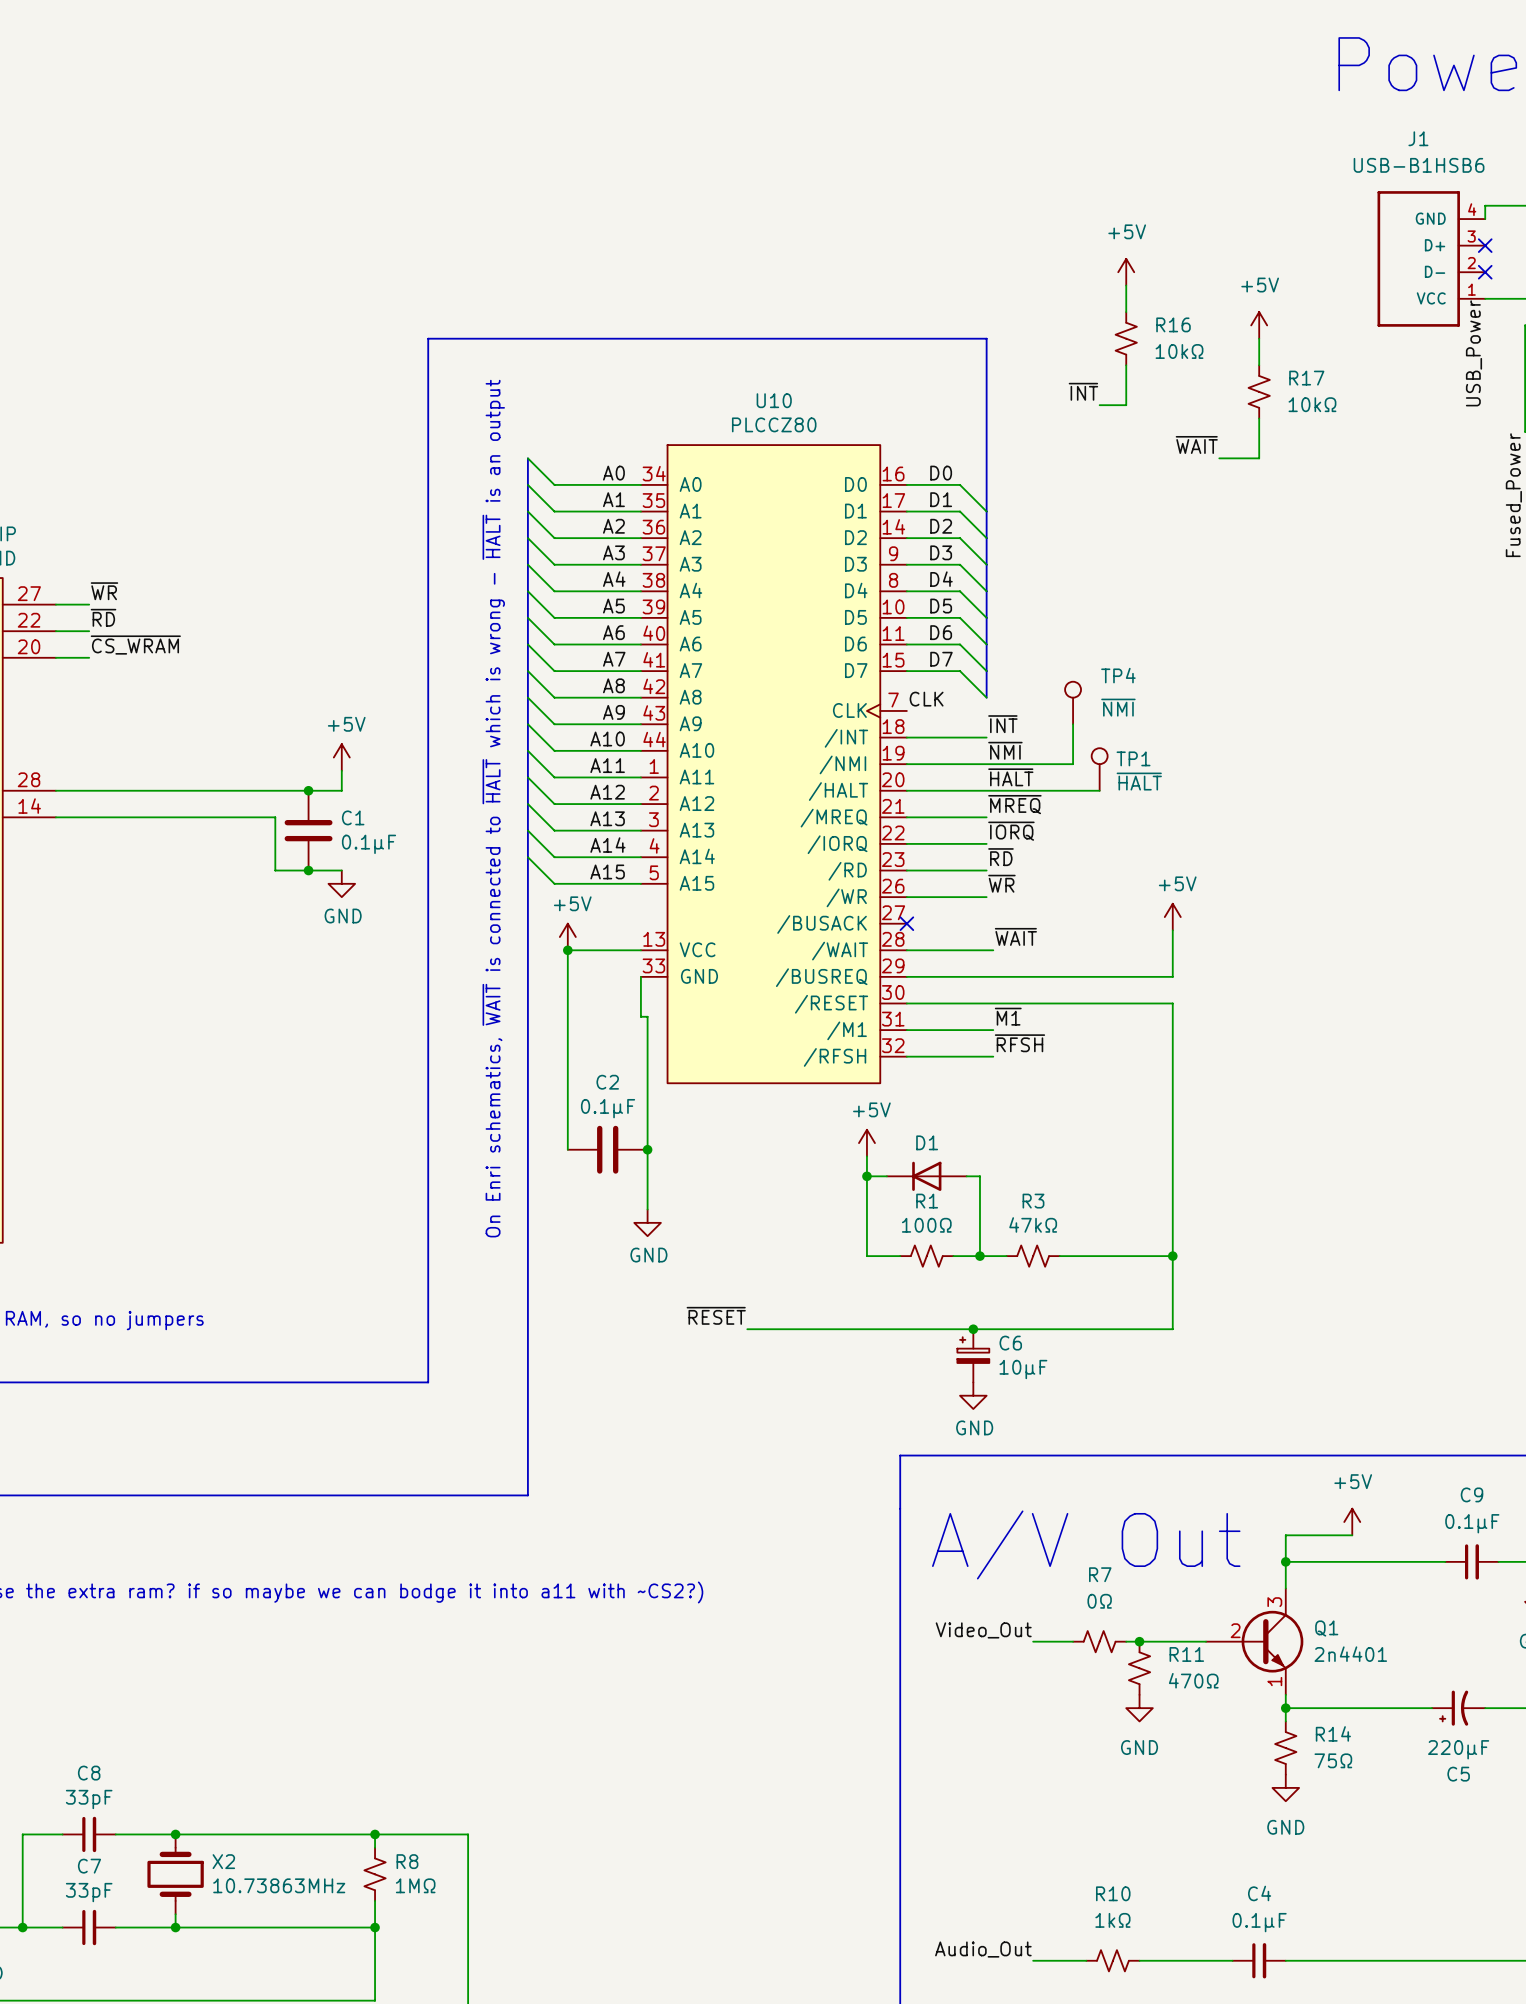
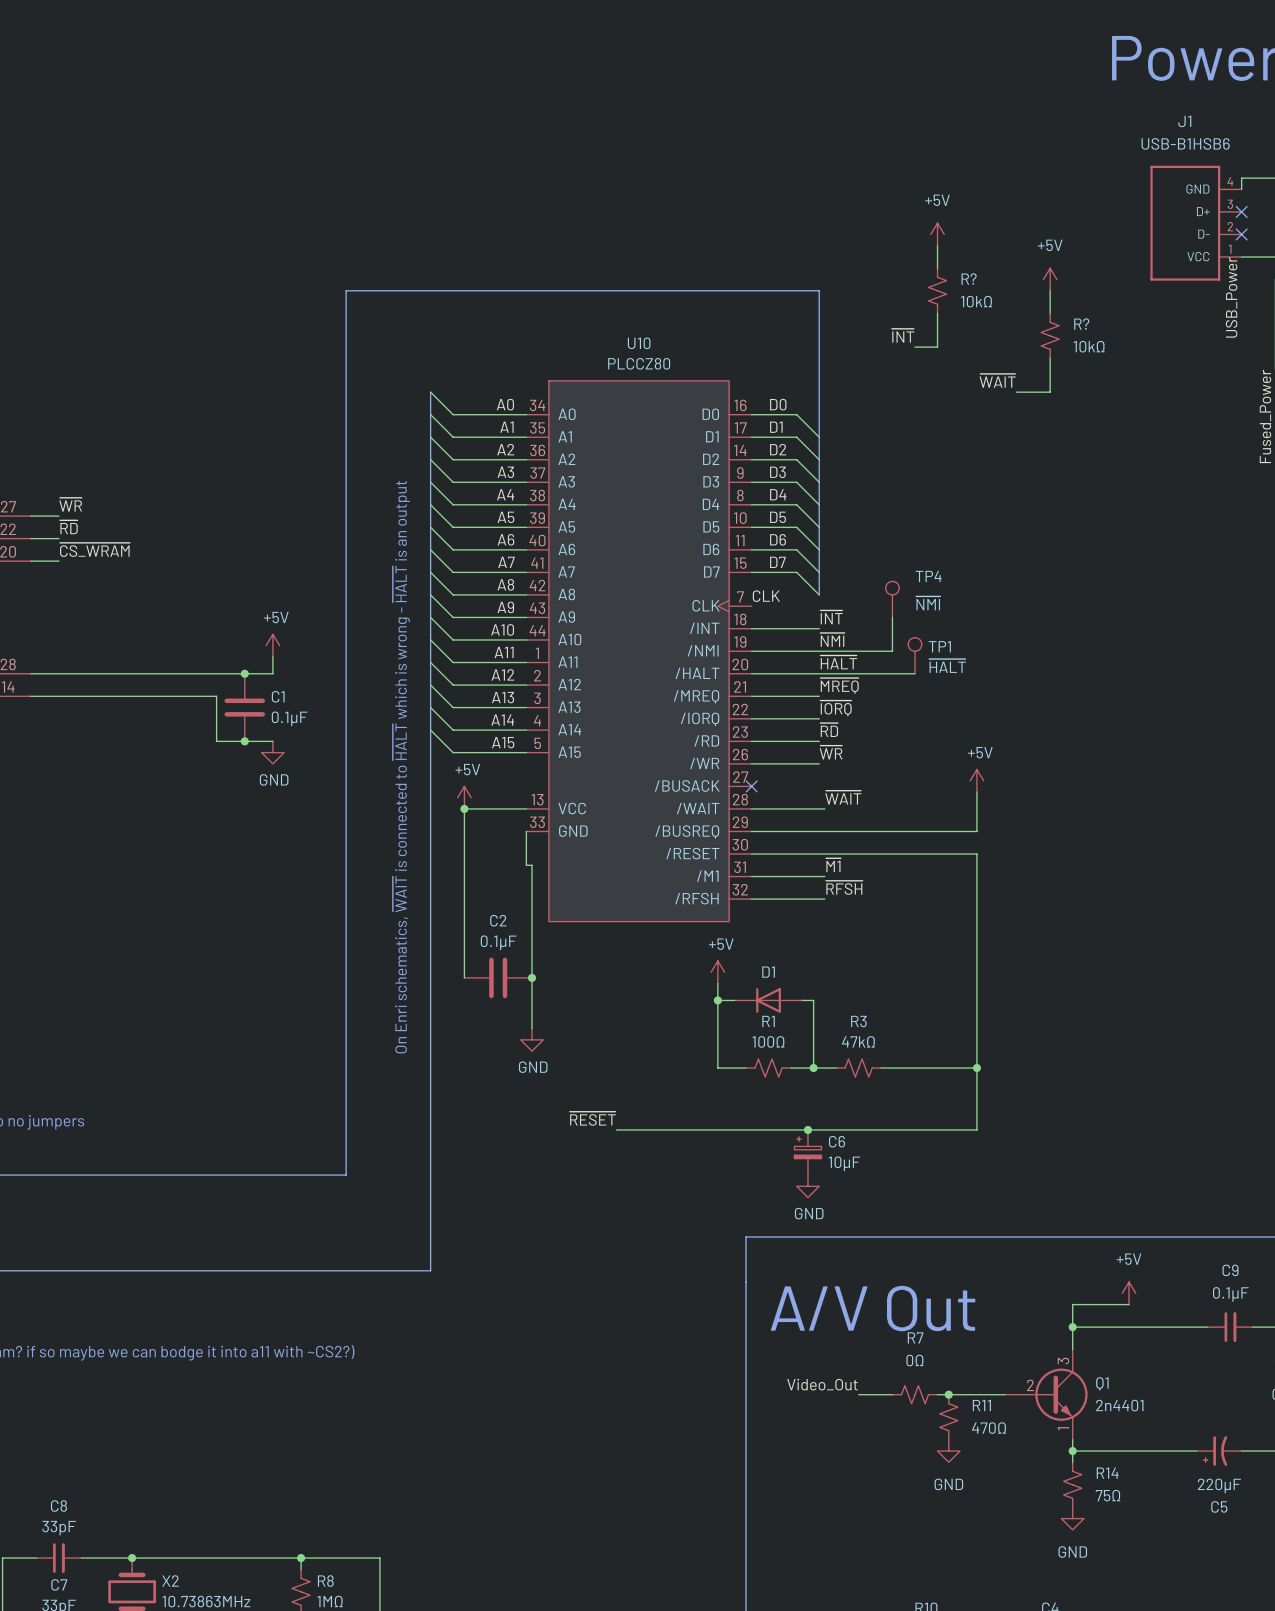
R16 name: R16 (1173, 324) -> R? (969, 279)
R17 name: R17 (1306, 378) -> R? (1081, 324)

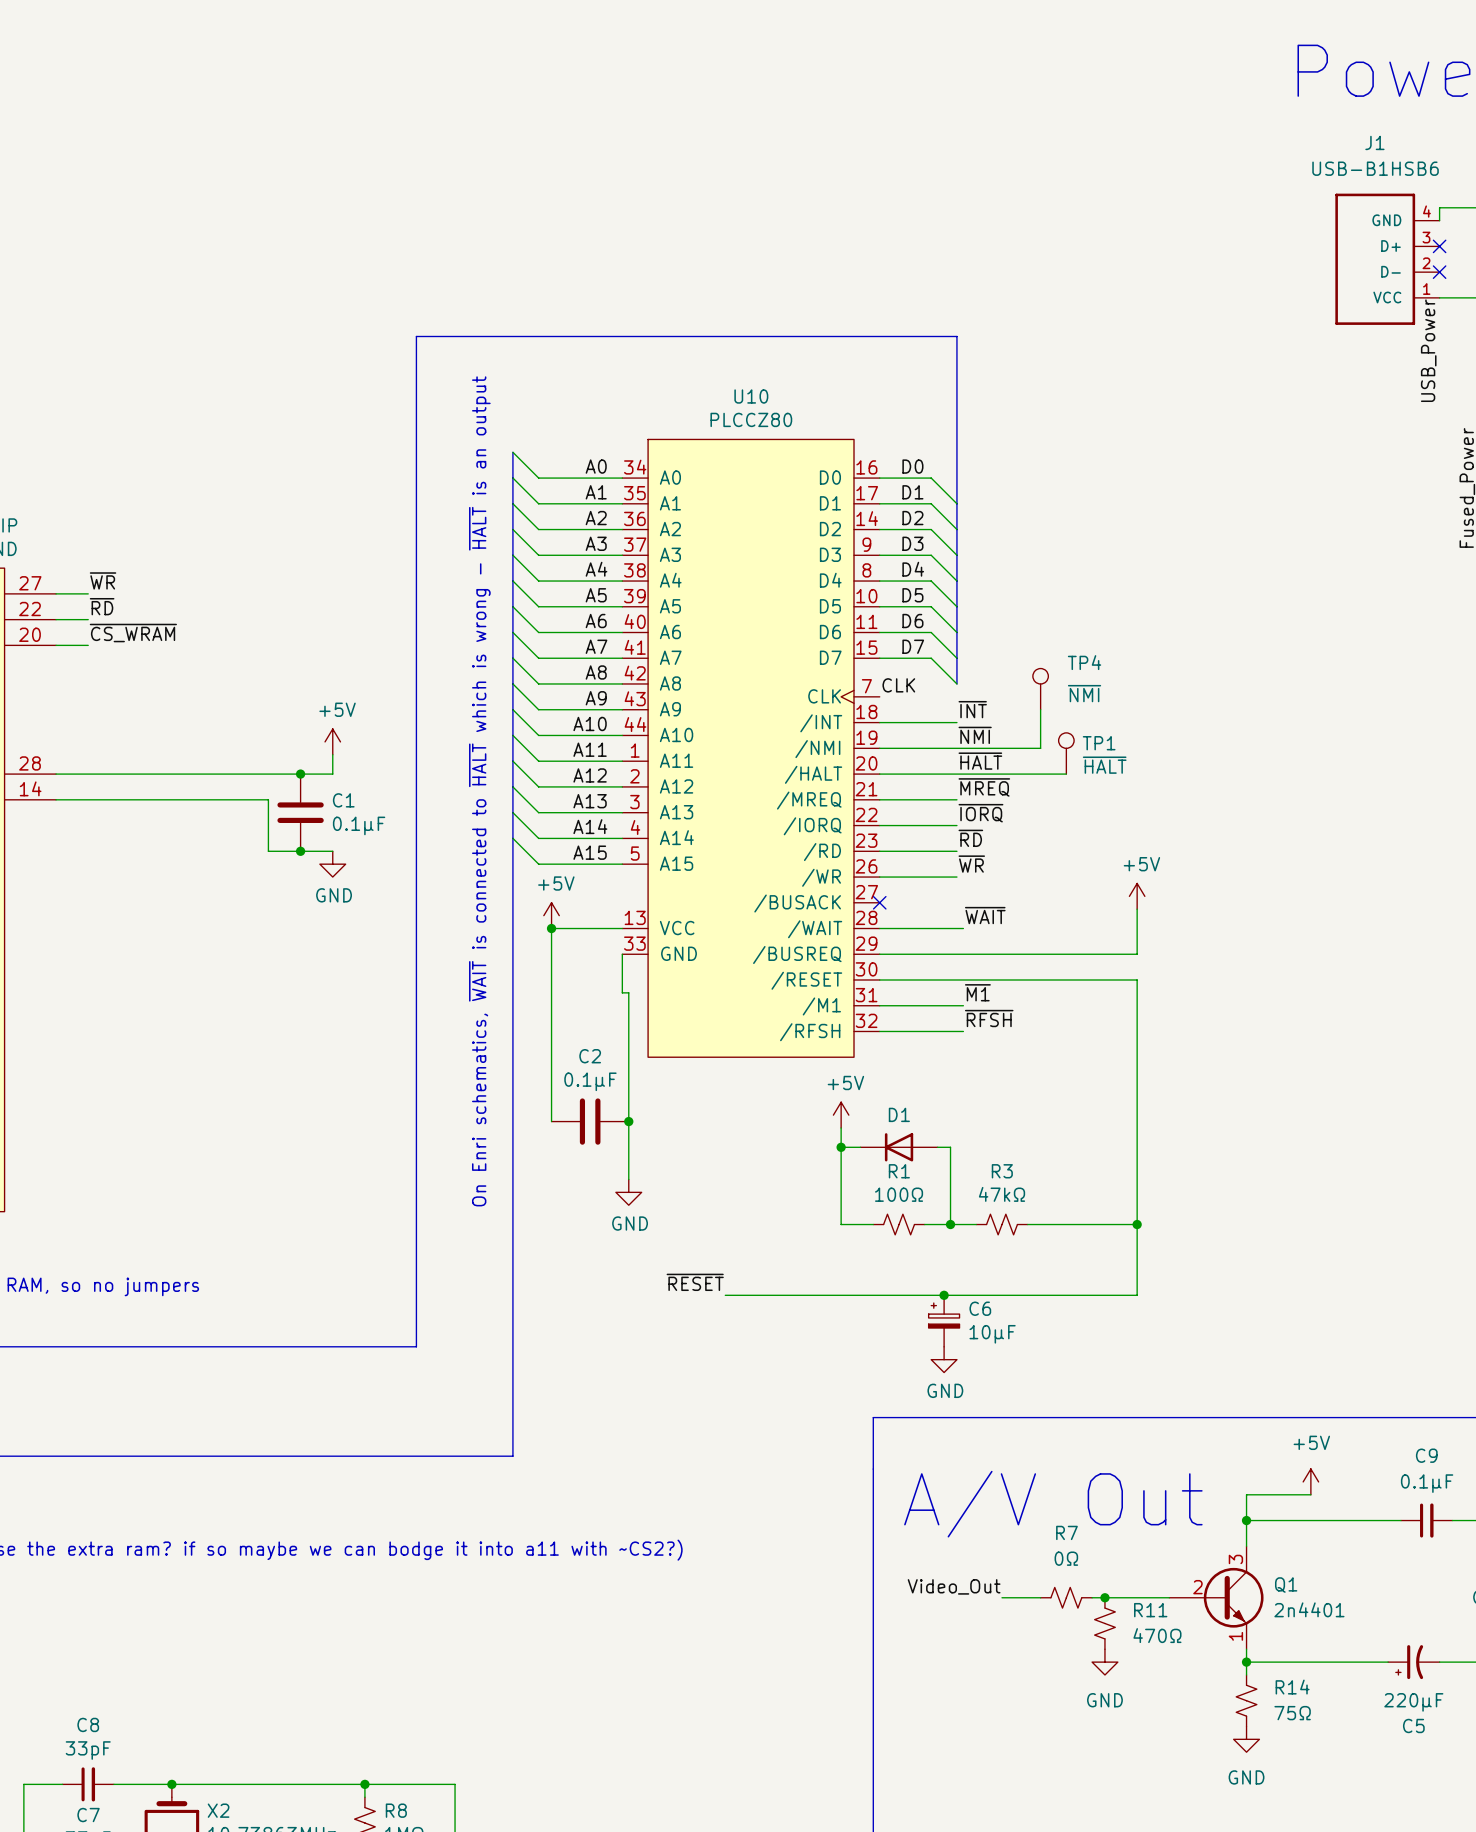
power symbol: +5V (937, 234) -> none
wire: (937, 245) (937, 268) -> none
power symbol: +5V (1050, 279) -> none
R?: 10kΩ (937, 290) -> none
wire: (1050, 290) (1050, 313) -> none
wire: (937, 313) (937, 347) (914, 347) -> none
label: ~{INT} (903, 335) -> none
R?: 10kΩ (1050, 335) -> none
wire: (1050, 358) (1050, 392) (1016, 392) -> none
label: ~{WAIT} (997, 380) -> none

